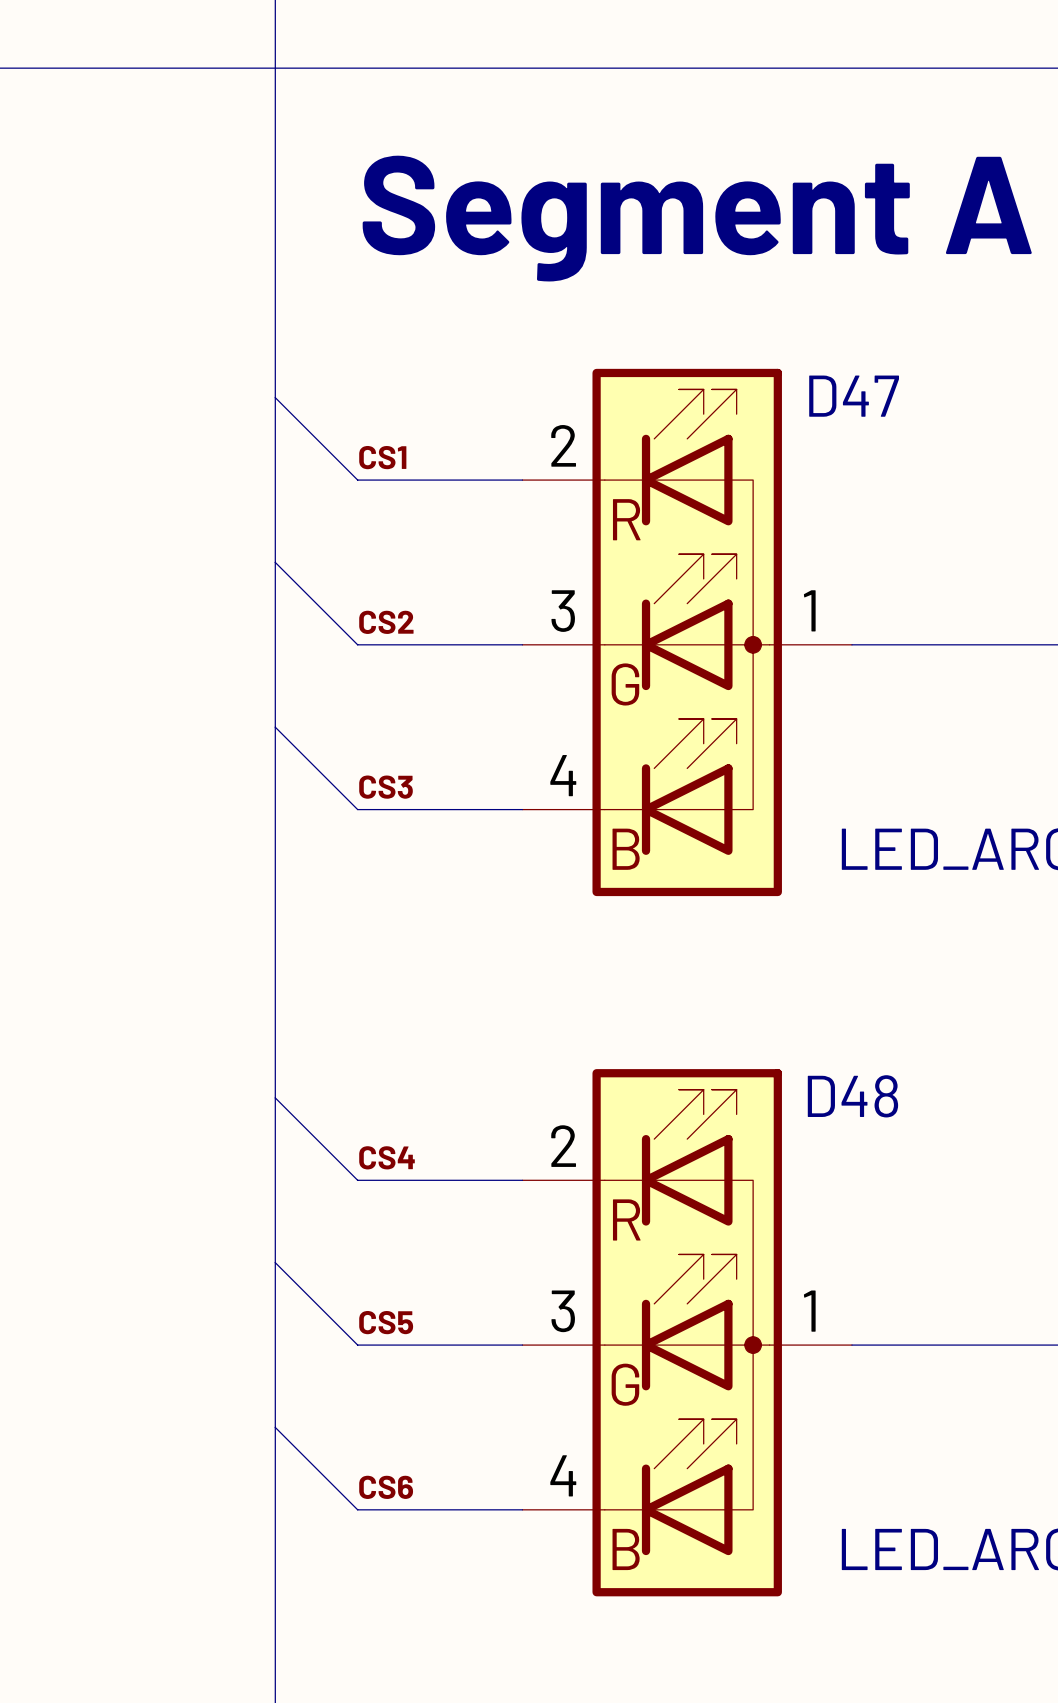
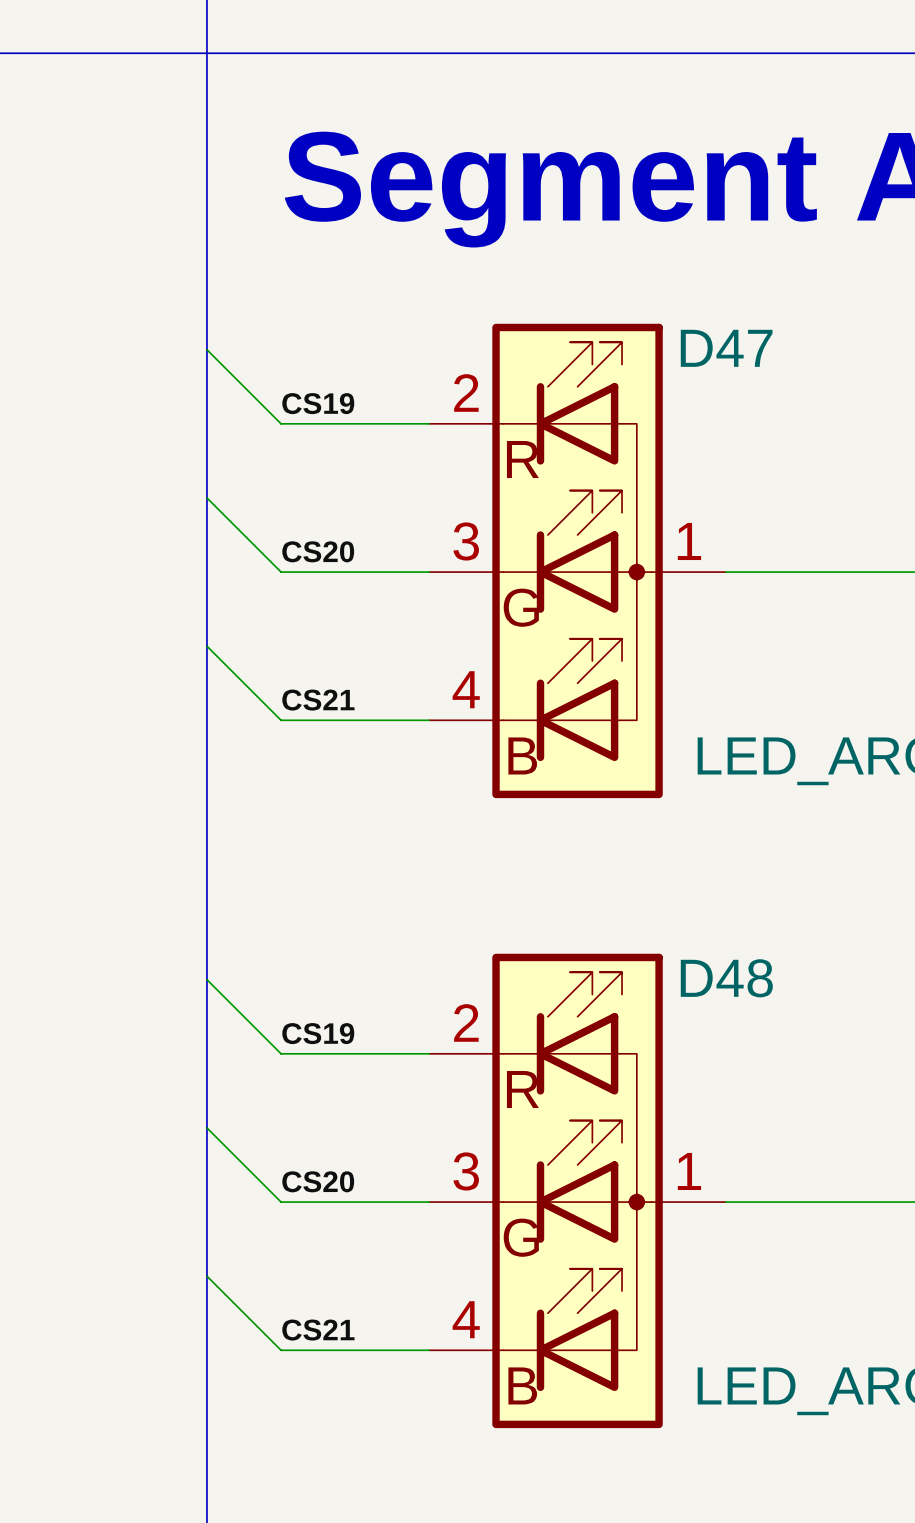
label: CS1 (382, 457) -> CS19 (318, 403)
label: CS2 (386, 622) -> CS20 (318, 551)
label: CS3 (386, 787) -> CS21 (318, 700)
label: CS4 (387, 1157) -> CS19 (318, 1033)
label: CS5 (386, 1322) -> CS20 (318, 1181)
label: CS6 (386, 1487) -> CS21 (318, 1330)

